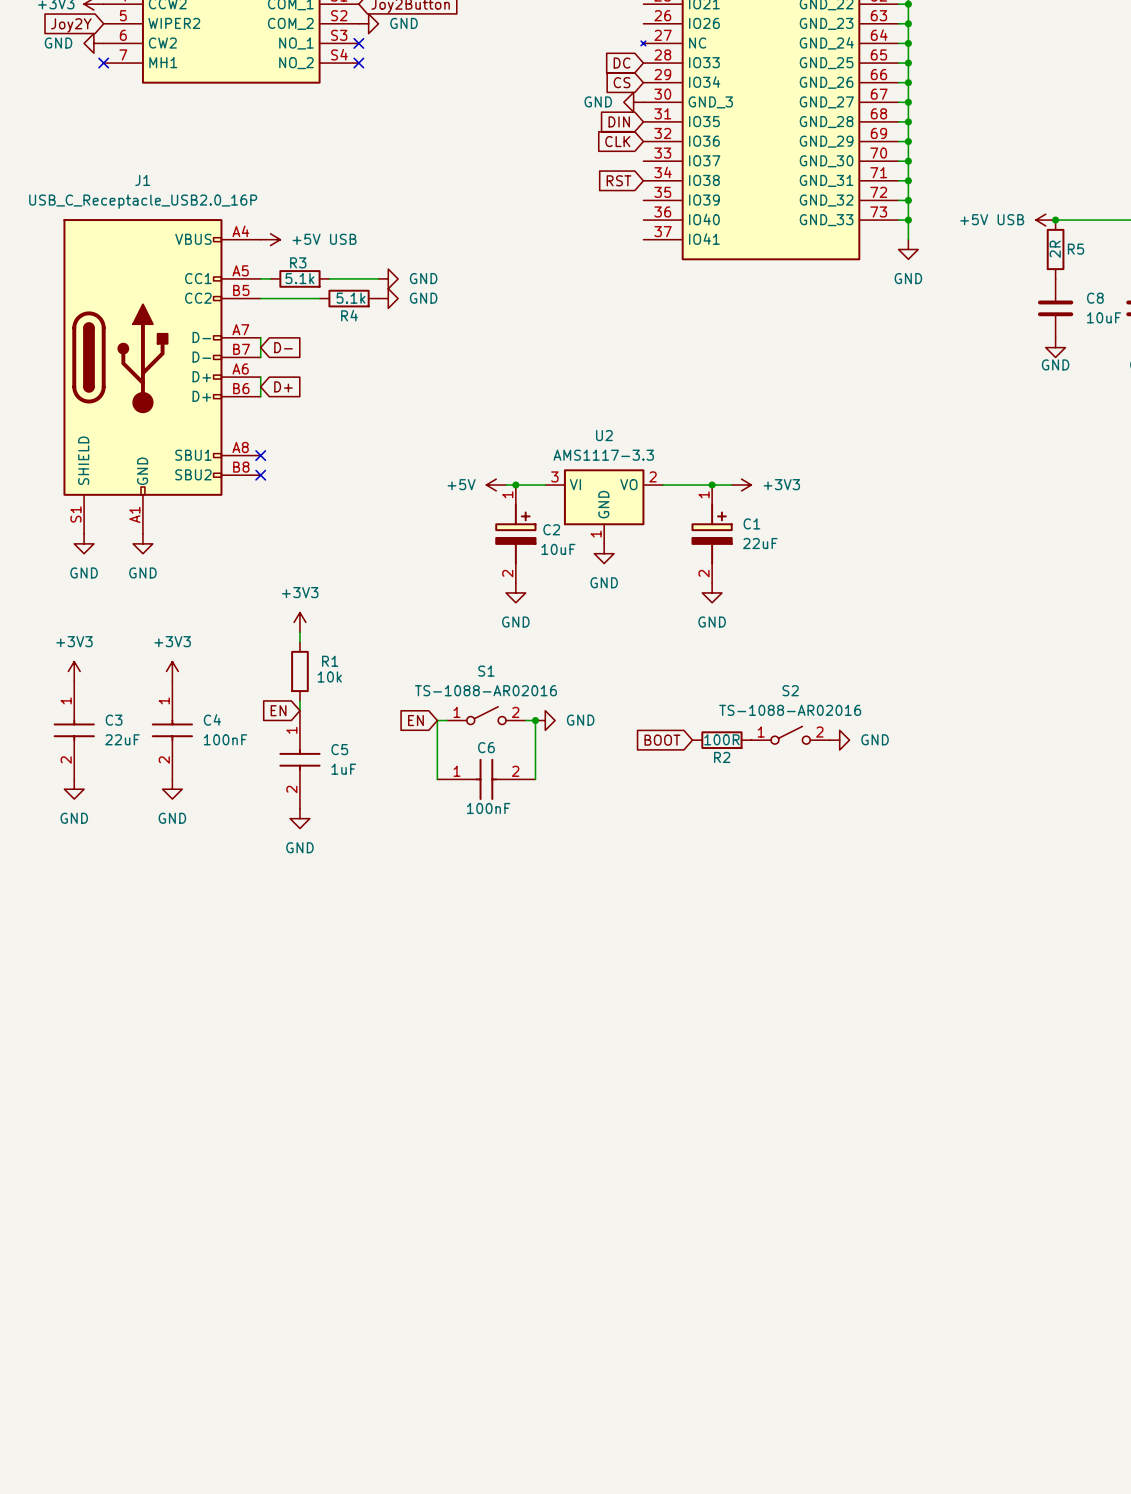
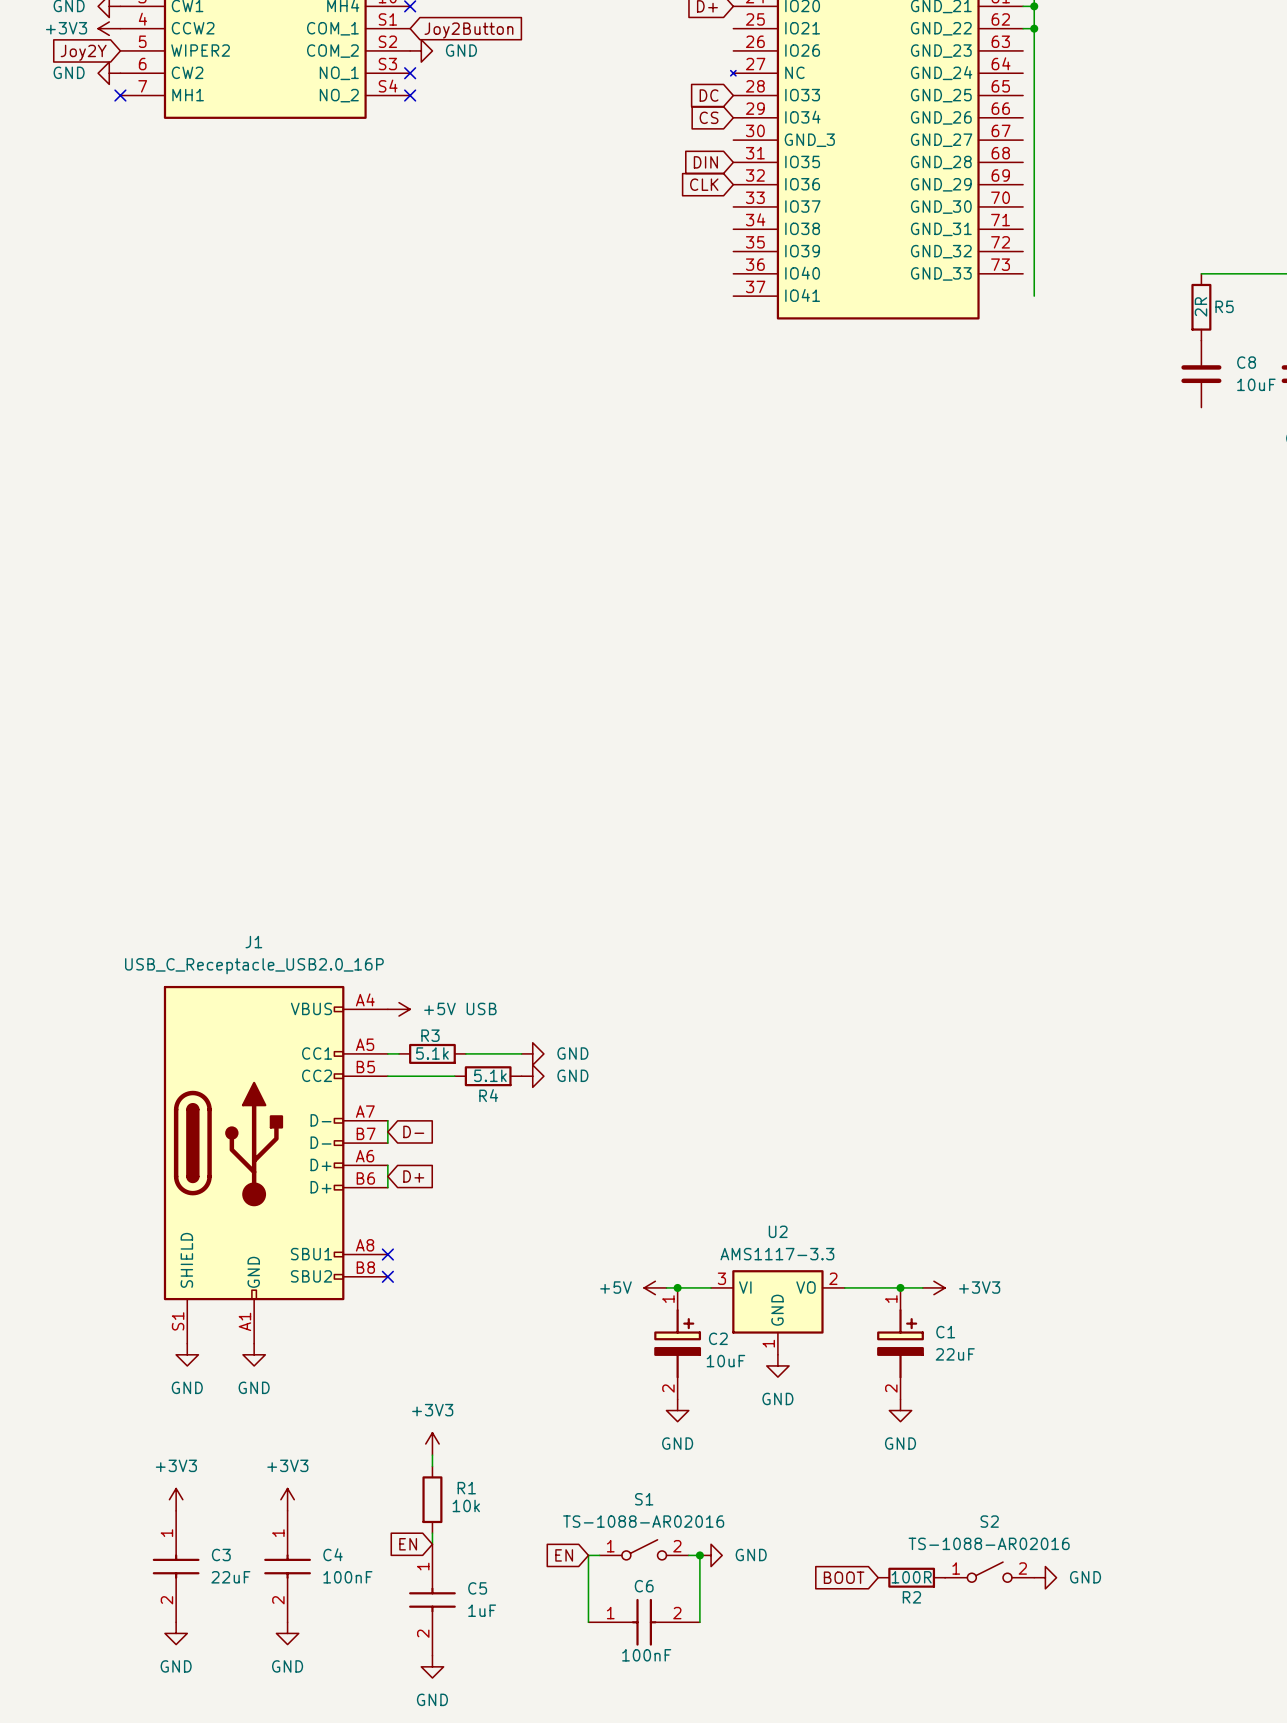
wire: (898, 23) (908, 23) -> none
junction: (908, 23) -> none
wire: (898, 43) (908, 43) -> none
junction: (908, 43) -> none
wire: (898, 63) (908, 63) -> none
junction: (908, 63) -> none
wire: (898, 82) (908, 82) -> none
junction: (908, 82) -> none
power symbol: GND (633, 102) -> none
wire: (898, 102) (908, 102) -> none
junction: (908, 102) -> none
wire: (898, 121) (908, 121) -> none
junction: (908, 121) -> none
wire: (898, 141) (908, 141) -> none
junction: (908, 141) -> none
wire: (898, 161) (908, 161) -> none
junction: (908, 161) -> none
global label: RST (618, 180) -> none
wire: (898, 180) (908, 180) -> none
junction: (908, 180) -> none
wire: (898, 200) (908, 200) -> none
junction: (908, 200) -> none
wire: (898, 220) (908, 220) -> none
junction: (908, 220) -> none
power symbol: +5V USB (1045, 220) -> none
junction: (1055, 220) -> none
power symbol: +5V USB (270, 239) -> none
power symbol: GND (908, 249) -> none
wire: (260, 278) (270, 278) -> none
R3 position: (299, 278) -> (432, 1053)
wire: (329, 278) (378, 278) -> none
power symbol: GND (388, 278) -> none
wire: (260, 298) (319, 298) -> none
R4 position: (349, 298) -> (488, 1076)
power symbol: GND (388, 298) -> none
wire: (260, 337) (260, 357) -> none
global label: D- (283, 347) -> none
power symbol: GND (1055, 347) -> none
J1 position: (162, 376) -> (275, 1164)
wire: (260, 377) (260, 396) -> none
global label: D+ (283, 386) -> none
no-connect mark: (260, 455) -> none
no-connect mark: (260, 475) -> none
power symbol: +5V (496, 485) -> none
wire: (506, 485) (545, 485) -> none
junction: (515, 485) -> none
wire: (663, 485) (731, 485) -> none
junction: (712, 485) -> none
power symbol: +3V3 (741, 485) -> none
U2 position: (604, 506) -> (777, 1312)
C2 position: (515, 534) -> (677, 1343)
C1 position: (712, 534) -> (900, 1343)
power symbol: GND (84, 543) -> none
power symbol: GND (142, 543) -> none
power symbol: GND (604, 553) -> none
power symbol: GND (515, 592) -> none
power symbol: GND (712, 592) -> none
power symbol: +3V3 (299, 622) -> none
wire: (299, 632) (299, 642) -> none
power symbol: +3V3 (74, 671) -> none
power symbol: +3V3 (172, 671) -> none
R1 position: (299, 671) -> (432, 1499)
wire: (299, 700) (299, 710) -> none
global label: EN (278, 710) -> none
S1 position: (486, 715) -> (644, 1549)
global label: EN (415, 720) -> none
wire: (447, 720) (437, 720) (437, 779) -> none
wire: (525, 720) (535, 720) (535, 779) -> none
junction: (535, 720) -> none
power symbol: GND (545, 720) -> none
C3 position: (74, 730) -> (176, 1566)
C4 position: (172, 730) -> (287, 1566)
S2 position: (790, 735) -> (989, 1572)
global label: BOOT (662, 740) -> none
R2 position: (721, 740) -> (911, 1577)
power symbol: GND (839, 740) -> none
C5 position: (299, 759) -> (432, 1599)
C6 position: (486, 779) -> (644, 1622)
power symbol: GND (74, 789) -> none
power symbol: GND (172, 789) -> none
power symbol: GND (299, 818) -> none
power symbol: none -> +5V USB (399, 1009)
wire: none -> (387, 1053) (399, 1053)
wire: none -> (465, 1053) (521, 1053)
power symbol: none -> GND (532, 1053)
wire: none -> (387, 1076) (454, 1076)
power symbol: none -> GND (532, 1076)
wire: none -> (387, 1120) (387, 1143)
global label: none -> D- (413, 1131)
wire: none -> (387, 1165) (387, 1187)
global label: none -> D+ (413, 1176)
no-connect mark: none -> (387, 1254)
no-connect mark: none -> (387, 1276)
power symbol: none -> +5V (655, 1287)
wire: none -> (666, 1287) (711, 1287)
junction: none -> (677, 1287)
wire: none -> (844, 1287) (922, 1287)
junction: none -> (900, 1287)
power symbol: none -> +3V3 (933, 1287)
power symbol: none -> GND (187, 1354)
power symbol: none -> GND (254, 1354)
power symbol: none -> GND (777, 1365)
power symbol: none -> GND (677, 1410)
power symbol: none -> GND (900, 1410)
power symbol: none -> +3V3 (432, 1443)
wire: none -> (432, 1455) (432, 1466)
power symbol: none -> +3V3 (176, 1499)
power symbol: none -> +3V3 (287, 1499)
wire: none -> (432, 1533) (432, 1544)
global label: none -> EN (408, 1544)
global label: none -> EN (564, 1555)
wire: none -> (599, 1555) (588, 1555) (588, 1622)
wire: none -> (688, 1555) (699, 1555) (699, 1622)
junction: none -> (699, 1555)
power symbol: none -> GND (711, 1555)
global label: none -> BOOT (844, 1577)
power symbol: none -> GND (1045, 1577)
power symbol: none -> GND (176, 1633)
power symbol: none -> GND (287, 1633)
power symbol: none -> GND (432, 1666)

